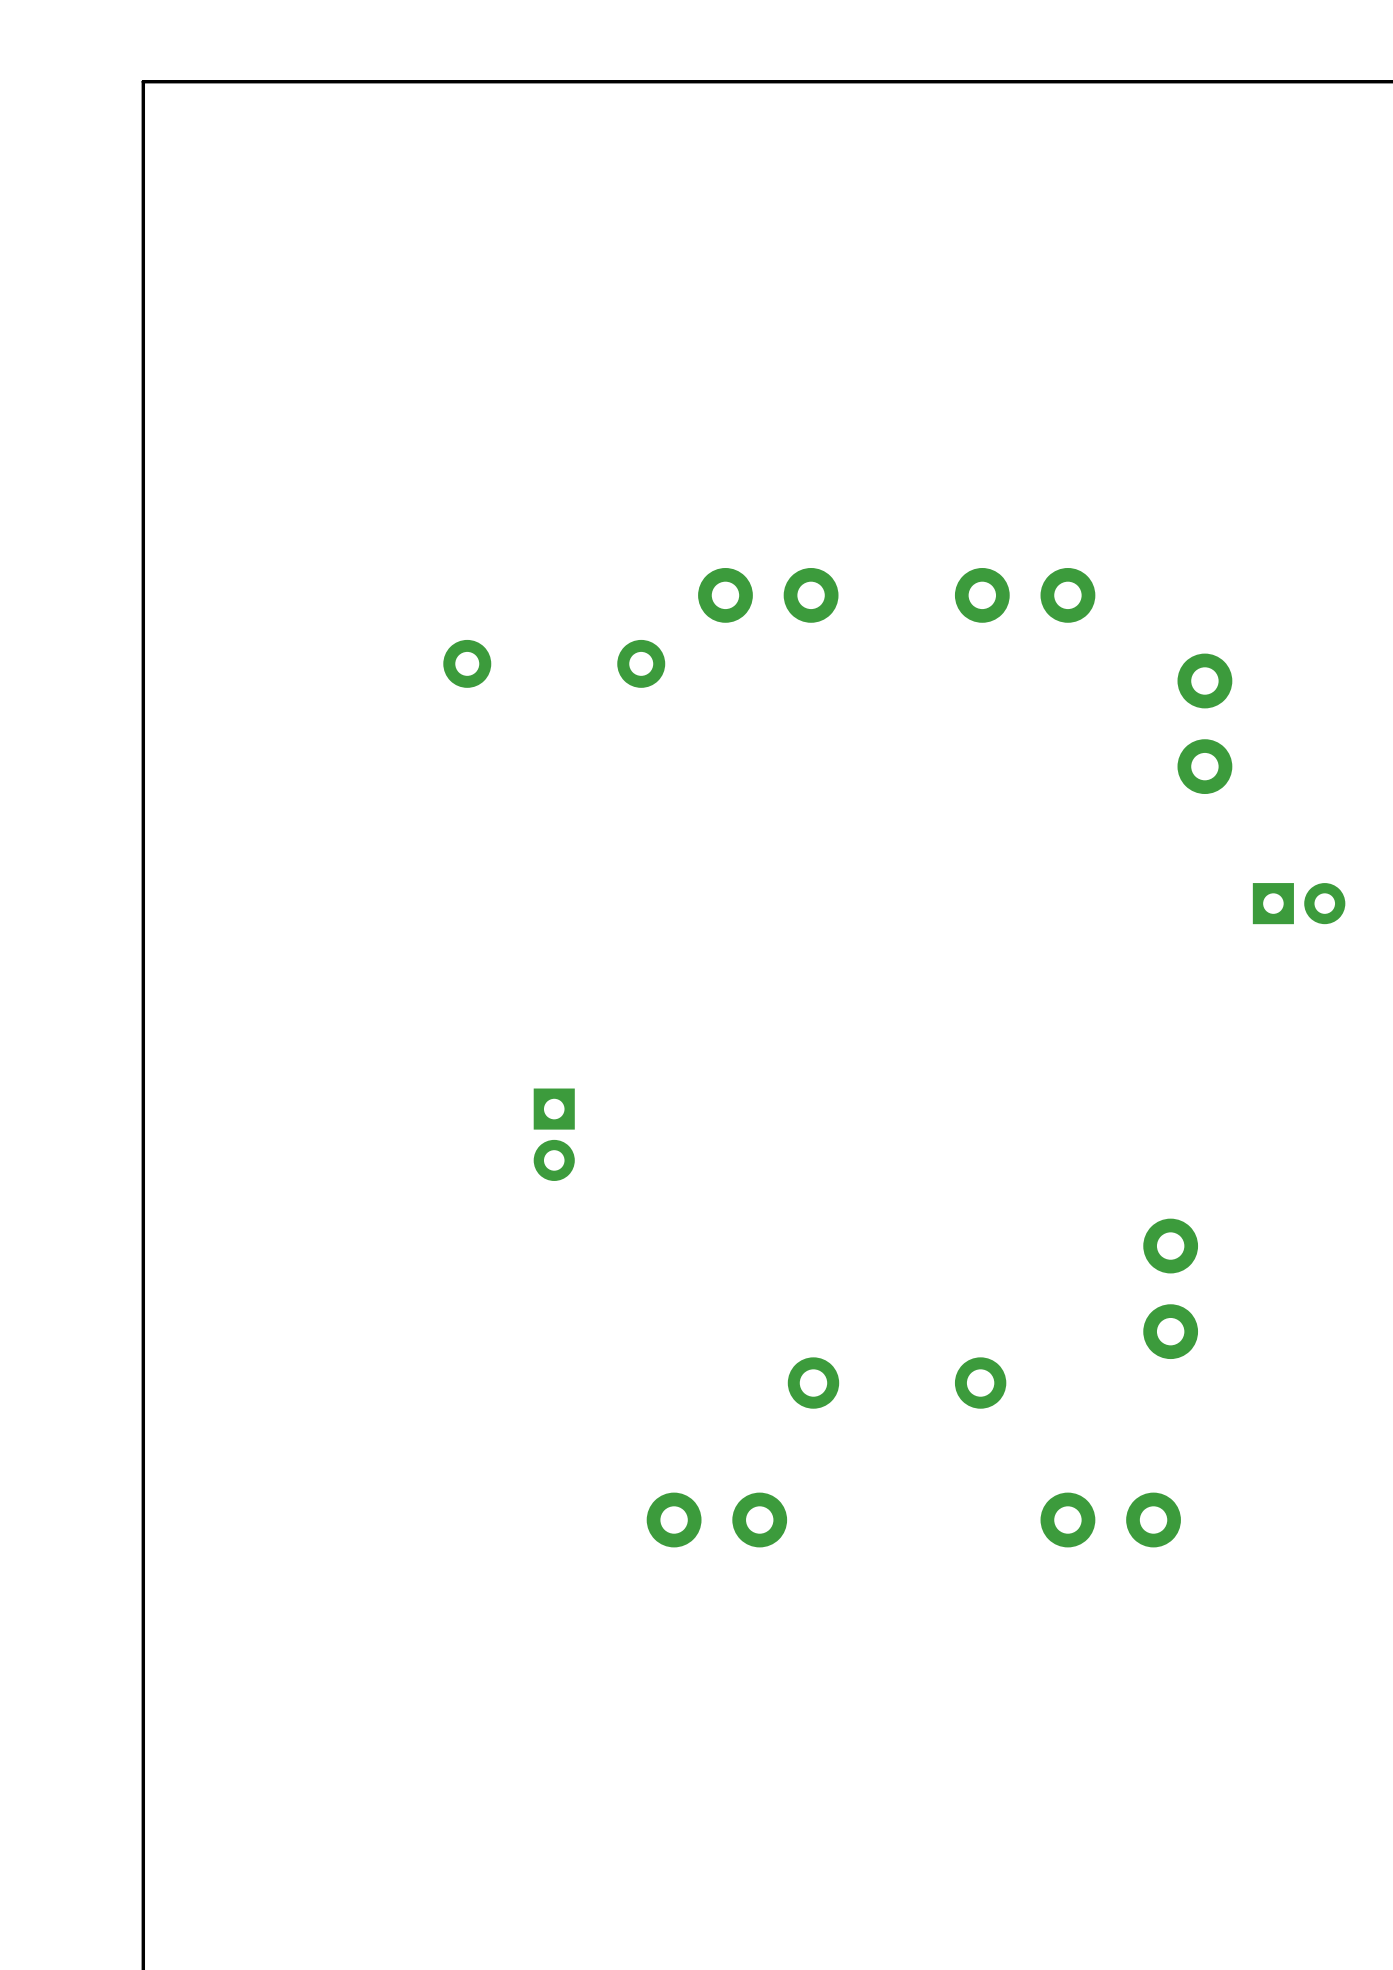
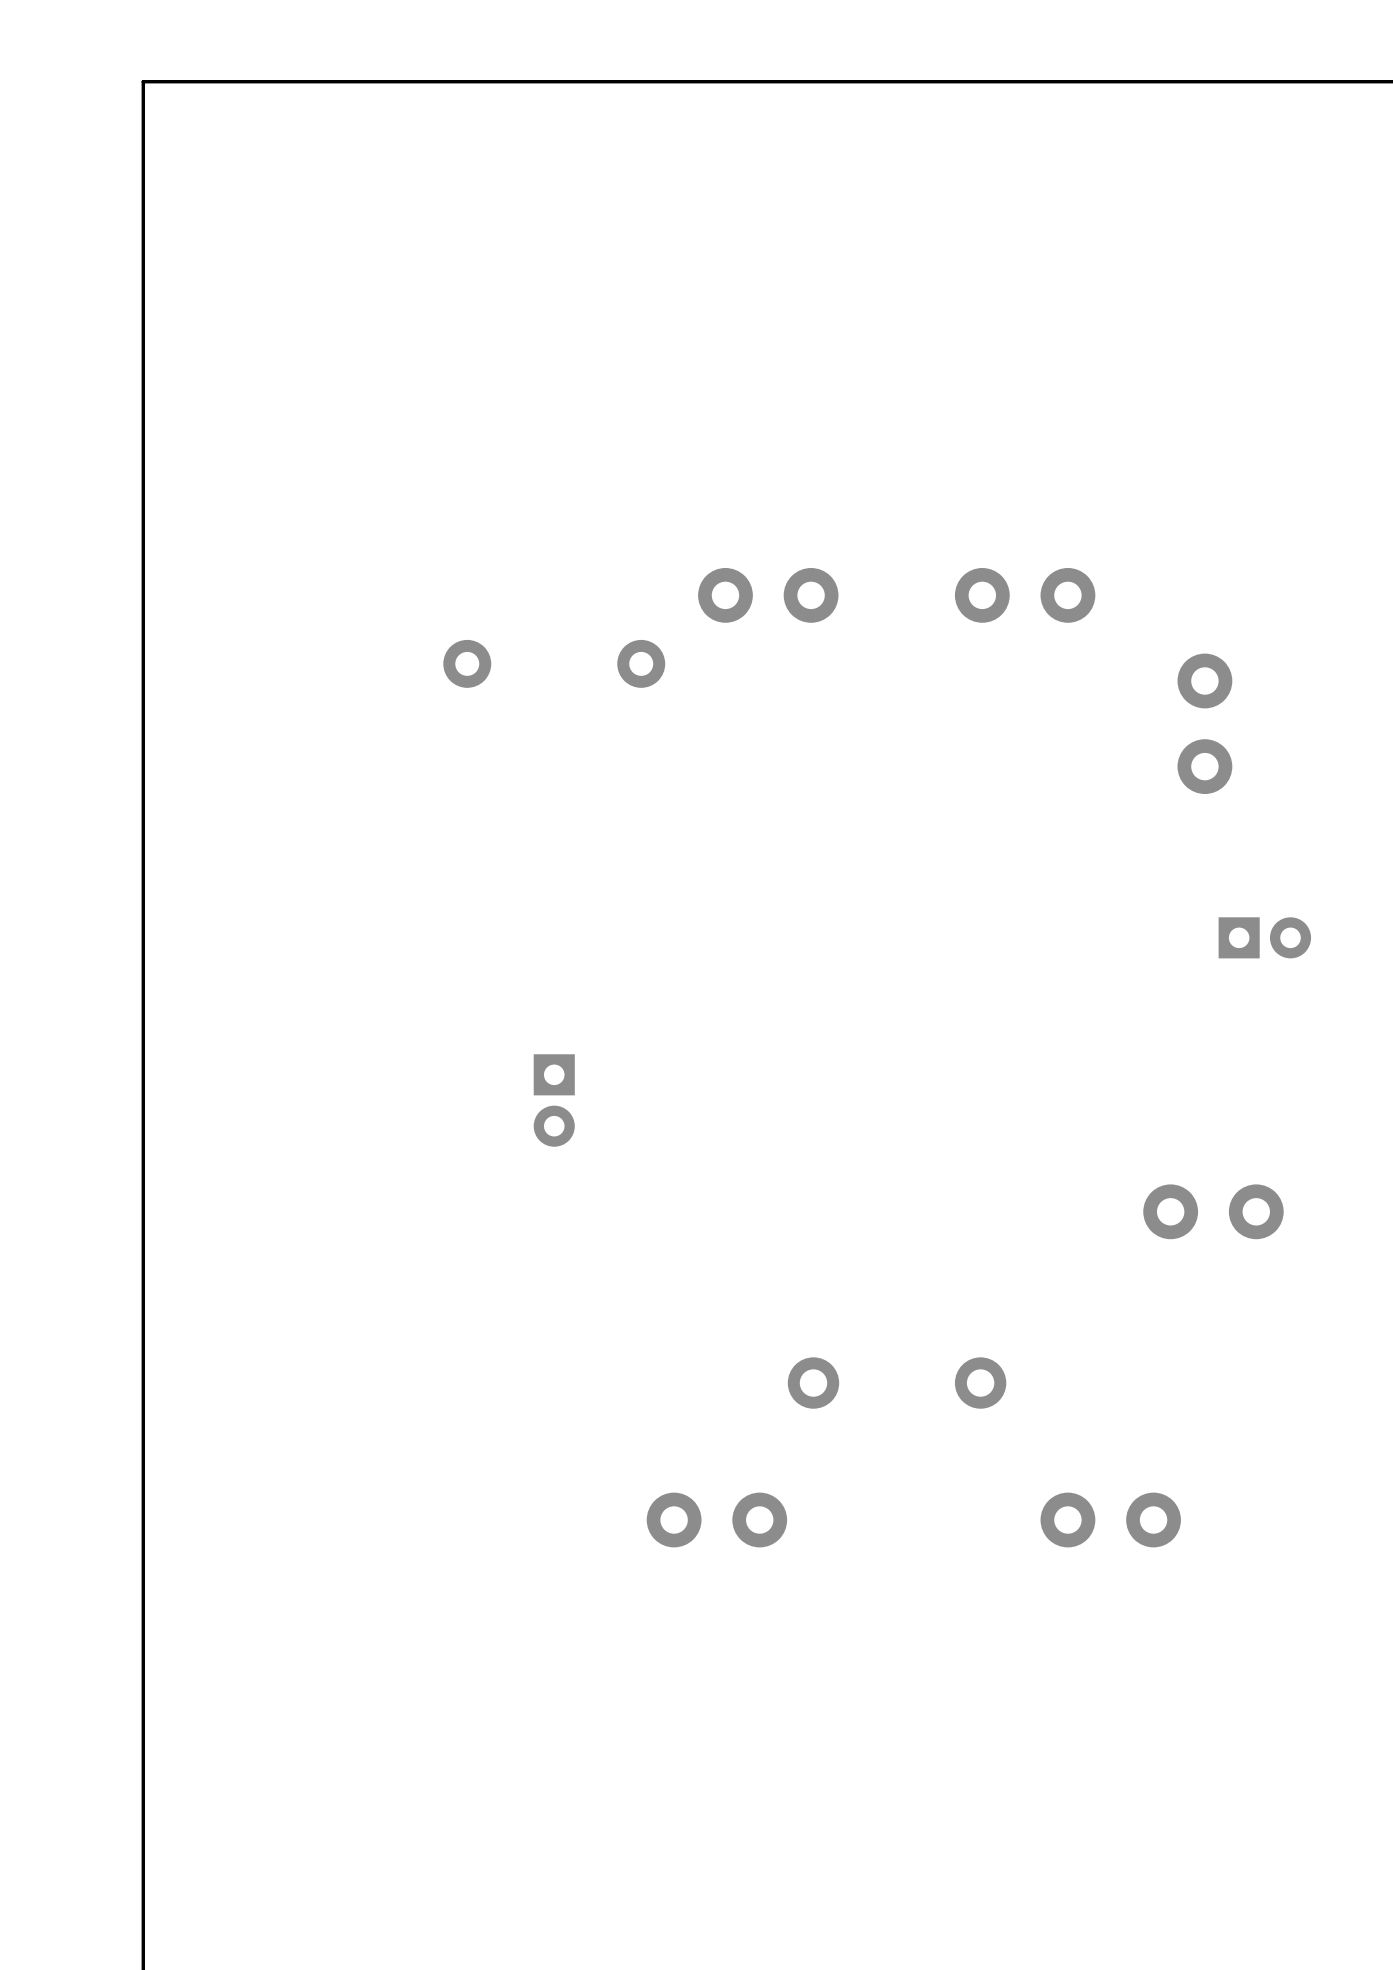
part position: (1299, 903) -> (1264, 937)
part position: (554, 1134) -> (554, 1100)
part rotation: 0° (1170, 1288) -> 90° clockwise (1213, 1211)
part position: (1170, 1288) -> (1213, 1211)

